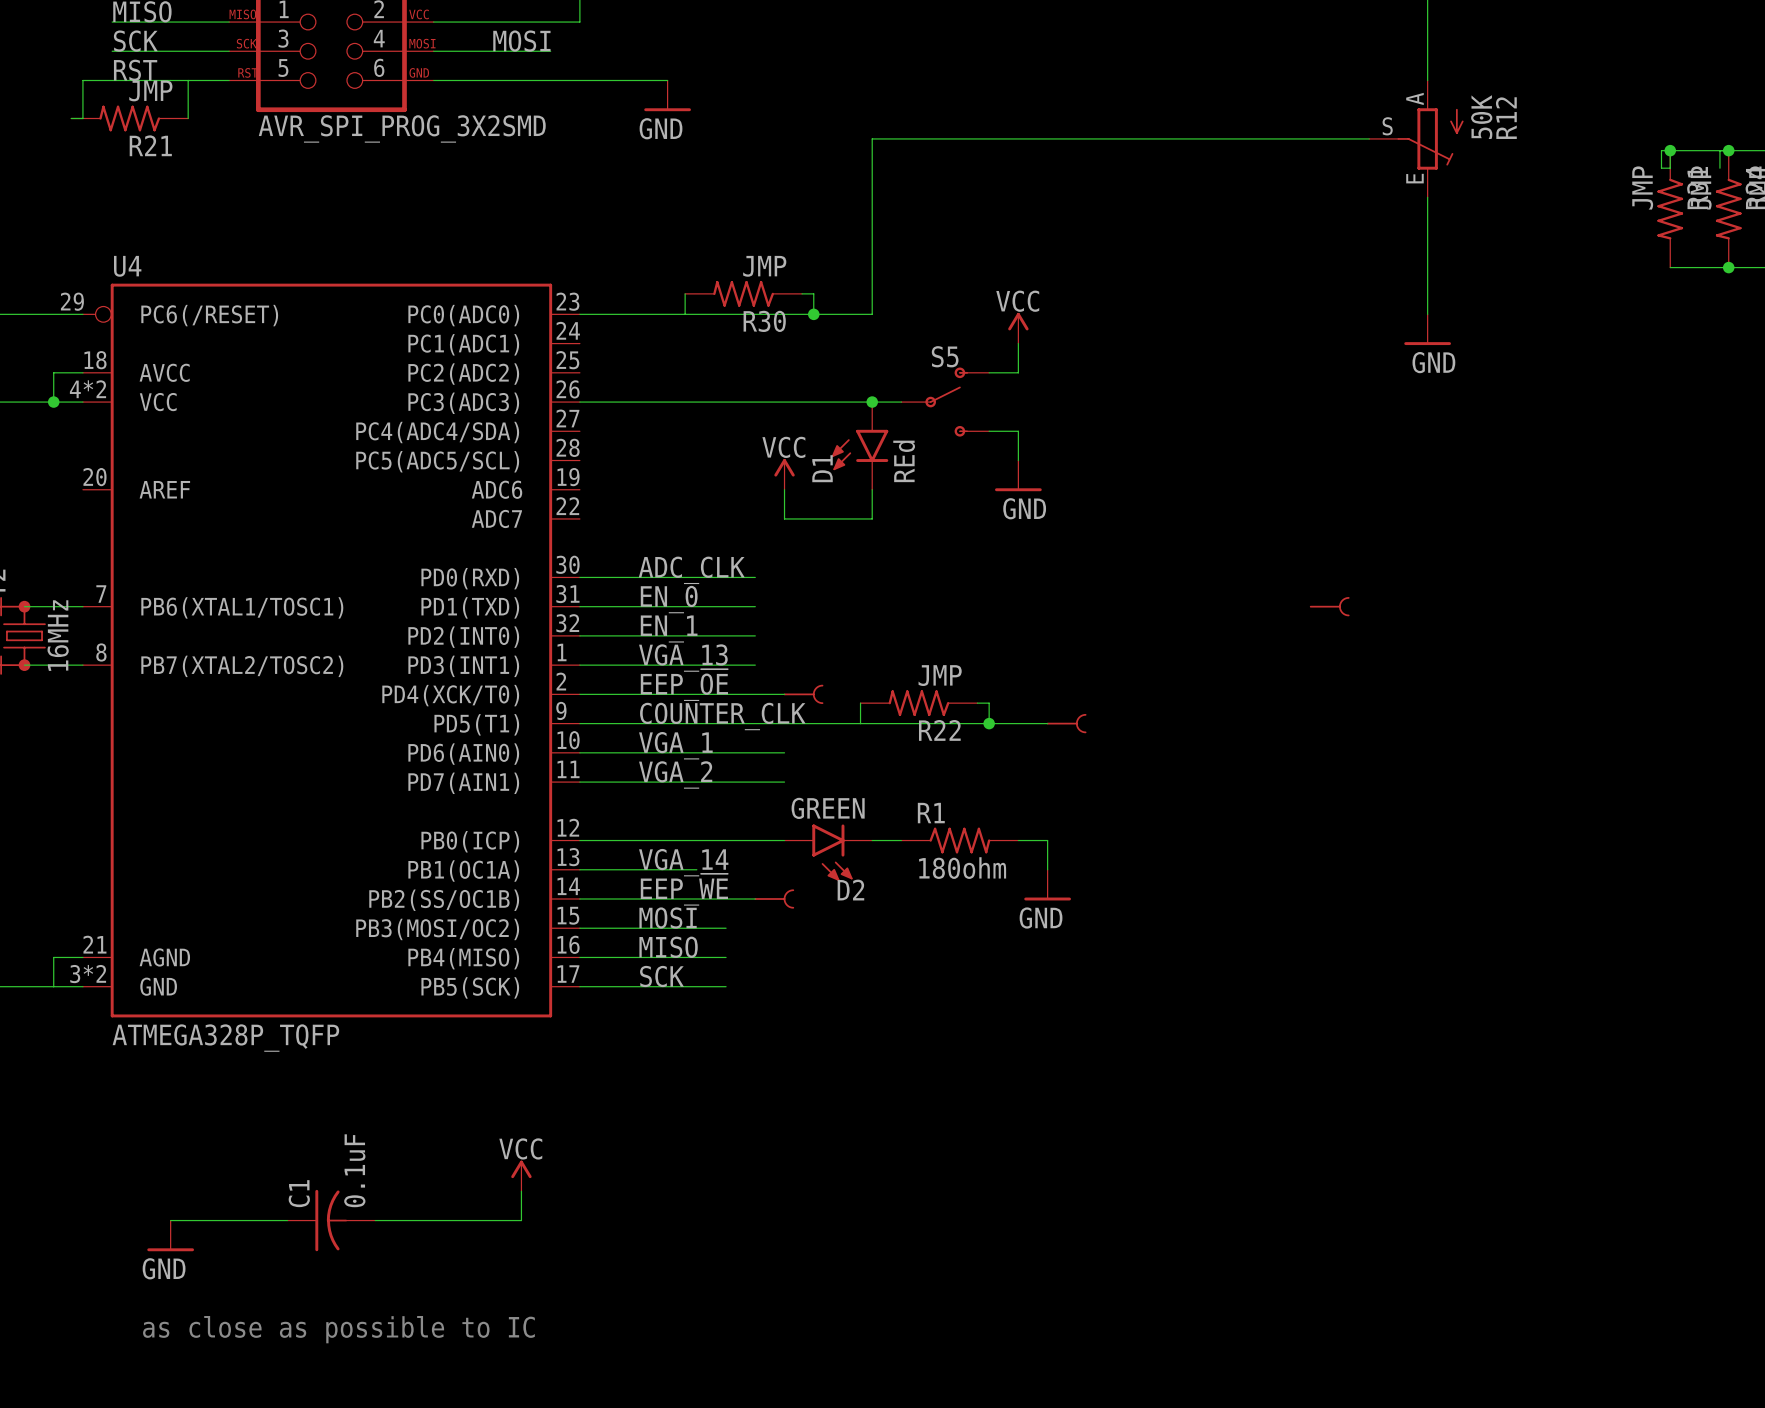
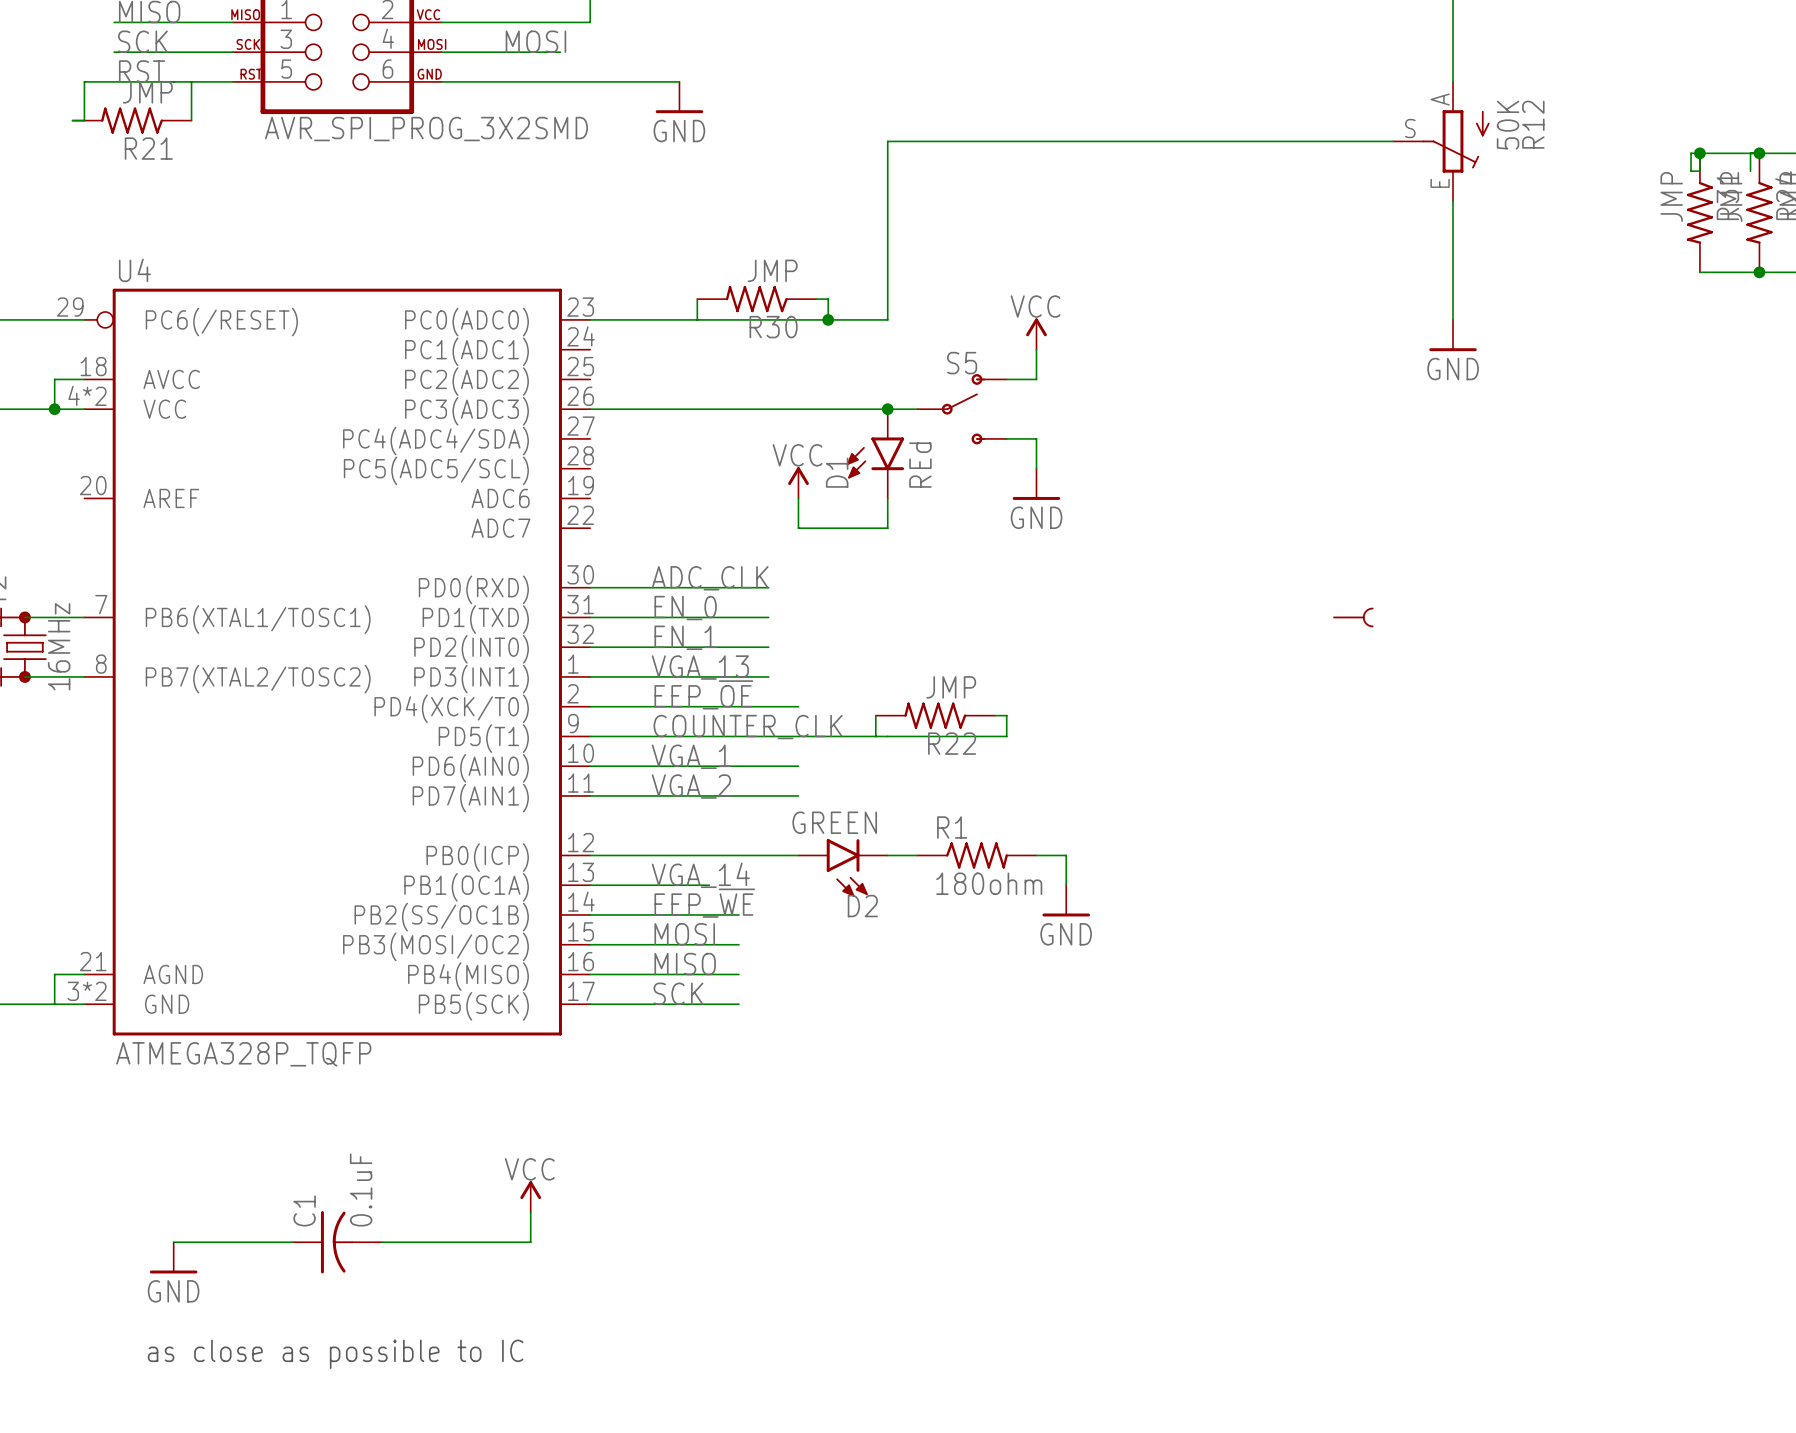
part: (803, 694) -> none
wire: (989, 723) (1047, 723) -> none
junction: (989, 723) -> none
part: (1066, 723) -> none
wire: (726, 899) (755, 899) -> none
part: (774, 899) -> none

